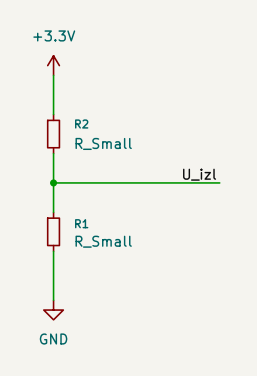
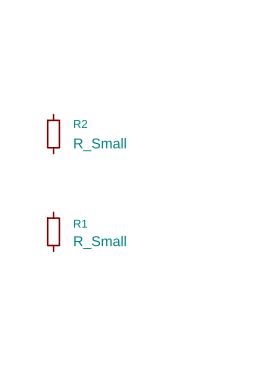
power symbol: +3.3V (53, 65) -> none
wire: (53, 75) (53, 114) -> none
wire: (53, 153) (53, 212) -> none
label: U_izl (199, 174) -> none
wire: (53, 182) (219, 182) -> none
junction: (53, 182) -> none
wire: (53, 251) (53, 300) -> none
power symbol: GND (53, 310) -> none

